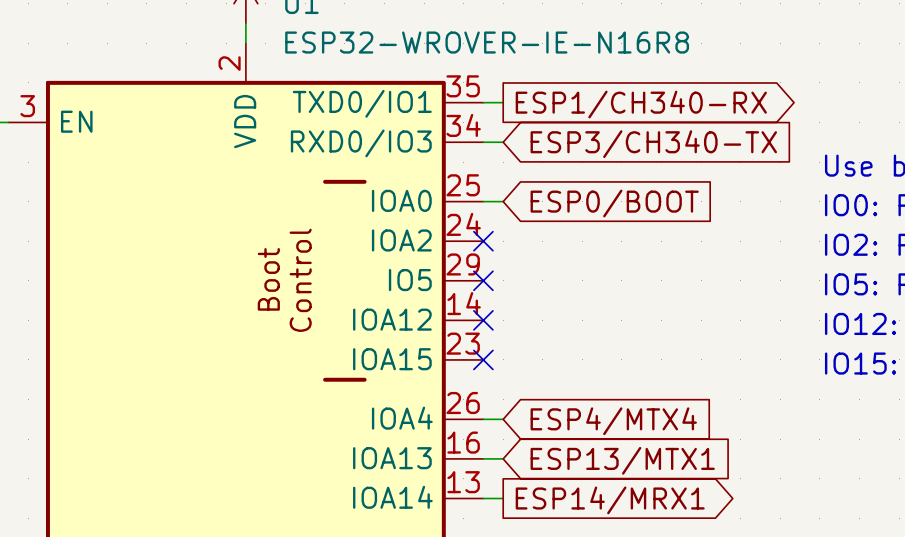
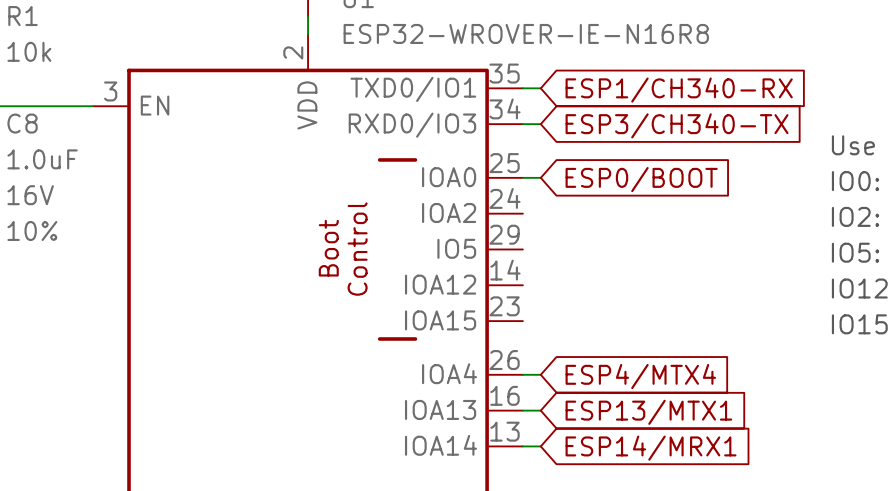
global label shape: output (641, 104) -> input (679, 90)
no-connect mark: (483, 241) -> none
no-connect mark: (483, 280) -> none
no-connect mark: (483, 320) -> none
no-connect mark: (483, 359) -> none
global label shape: output (610, 500) -> input (651, 448)

